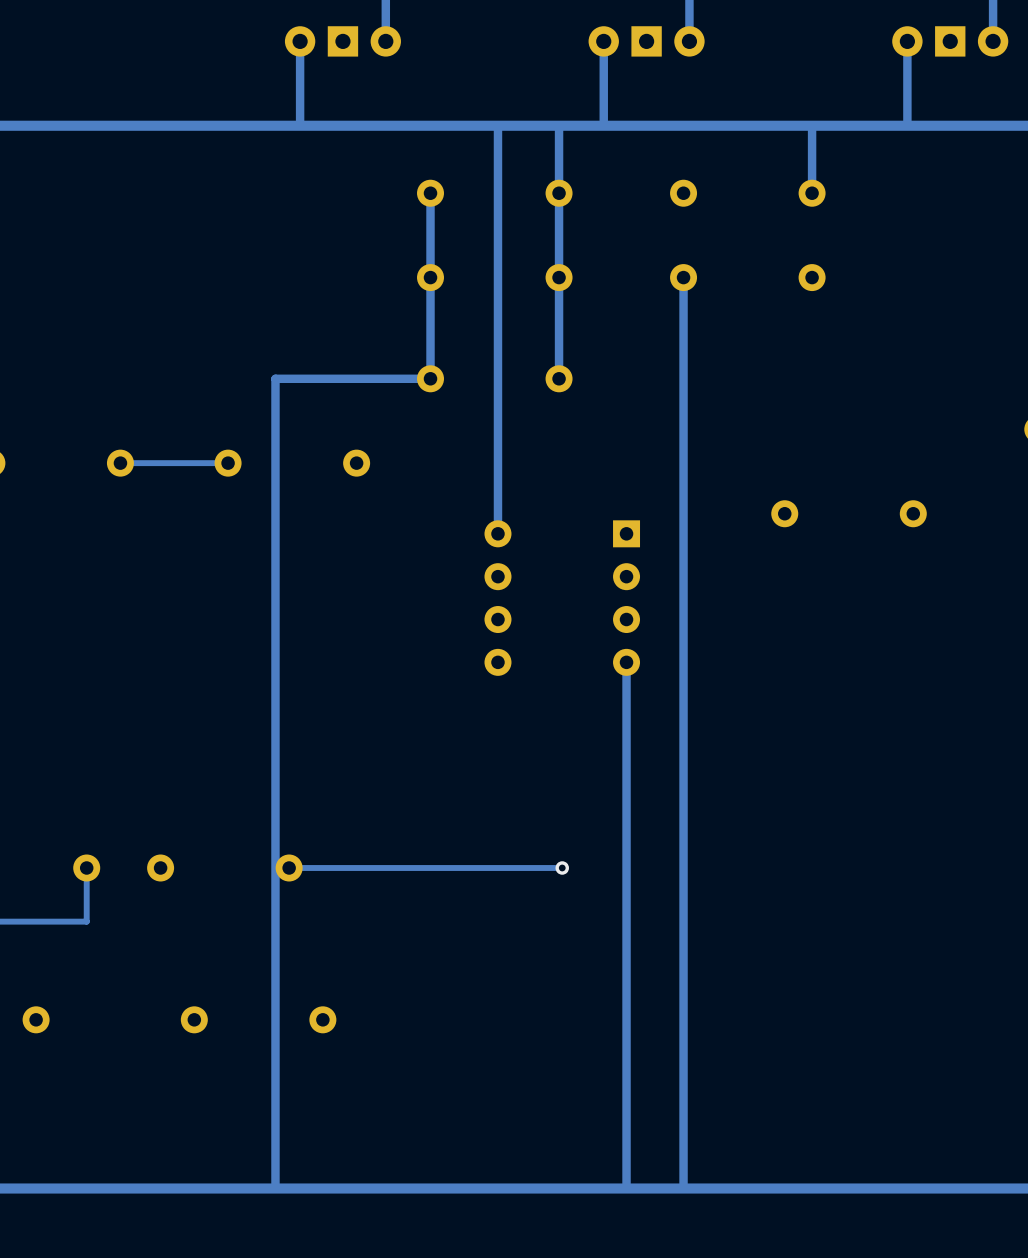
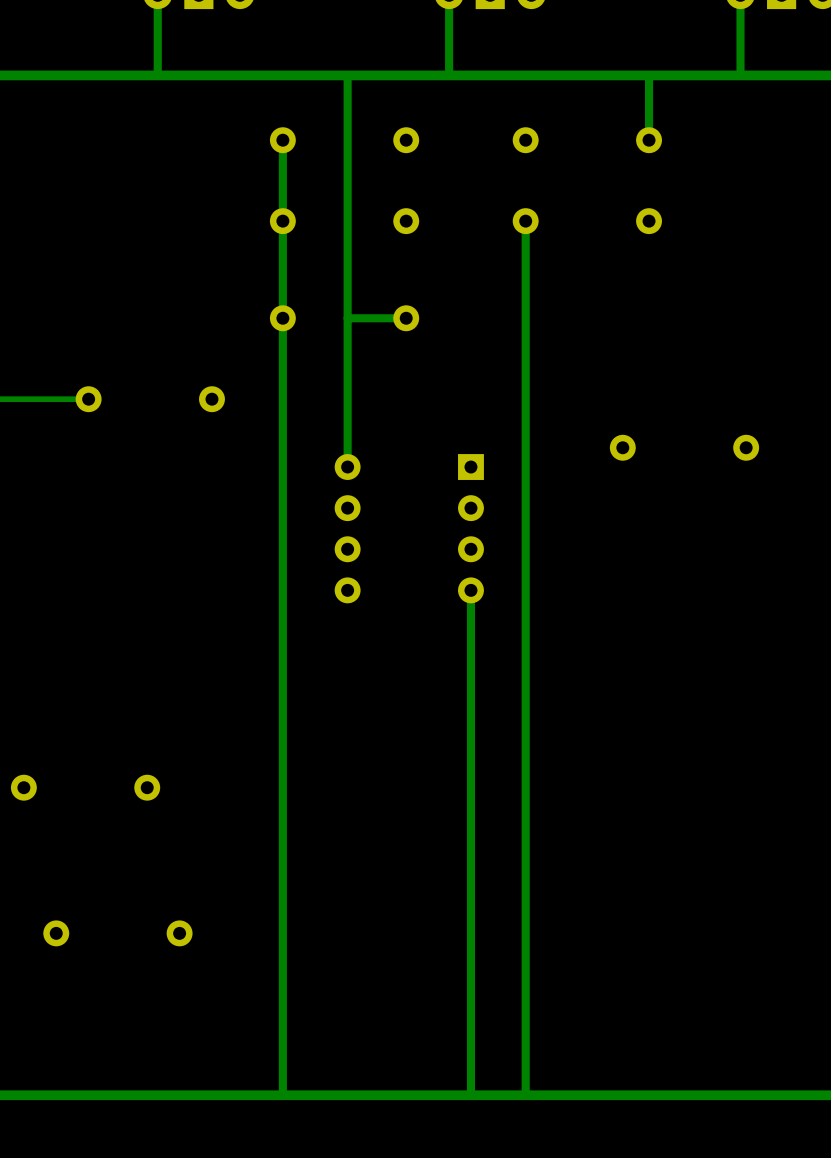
track: (559, 125) (559, 378) -> (347, 318) (406, 318)
track: (430, 378) (275, 378) (275, 1188) -> (282, 318) (282, 1095)
track: (562, 867) (289, 867) -> none
via: (562, 867) -> none

